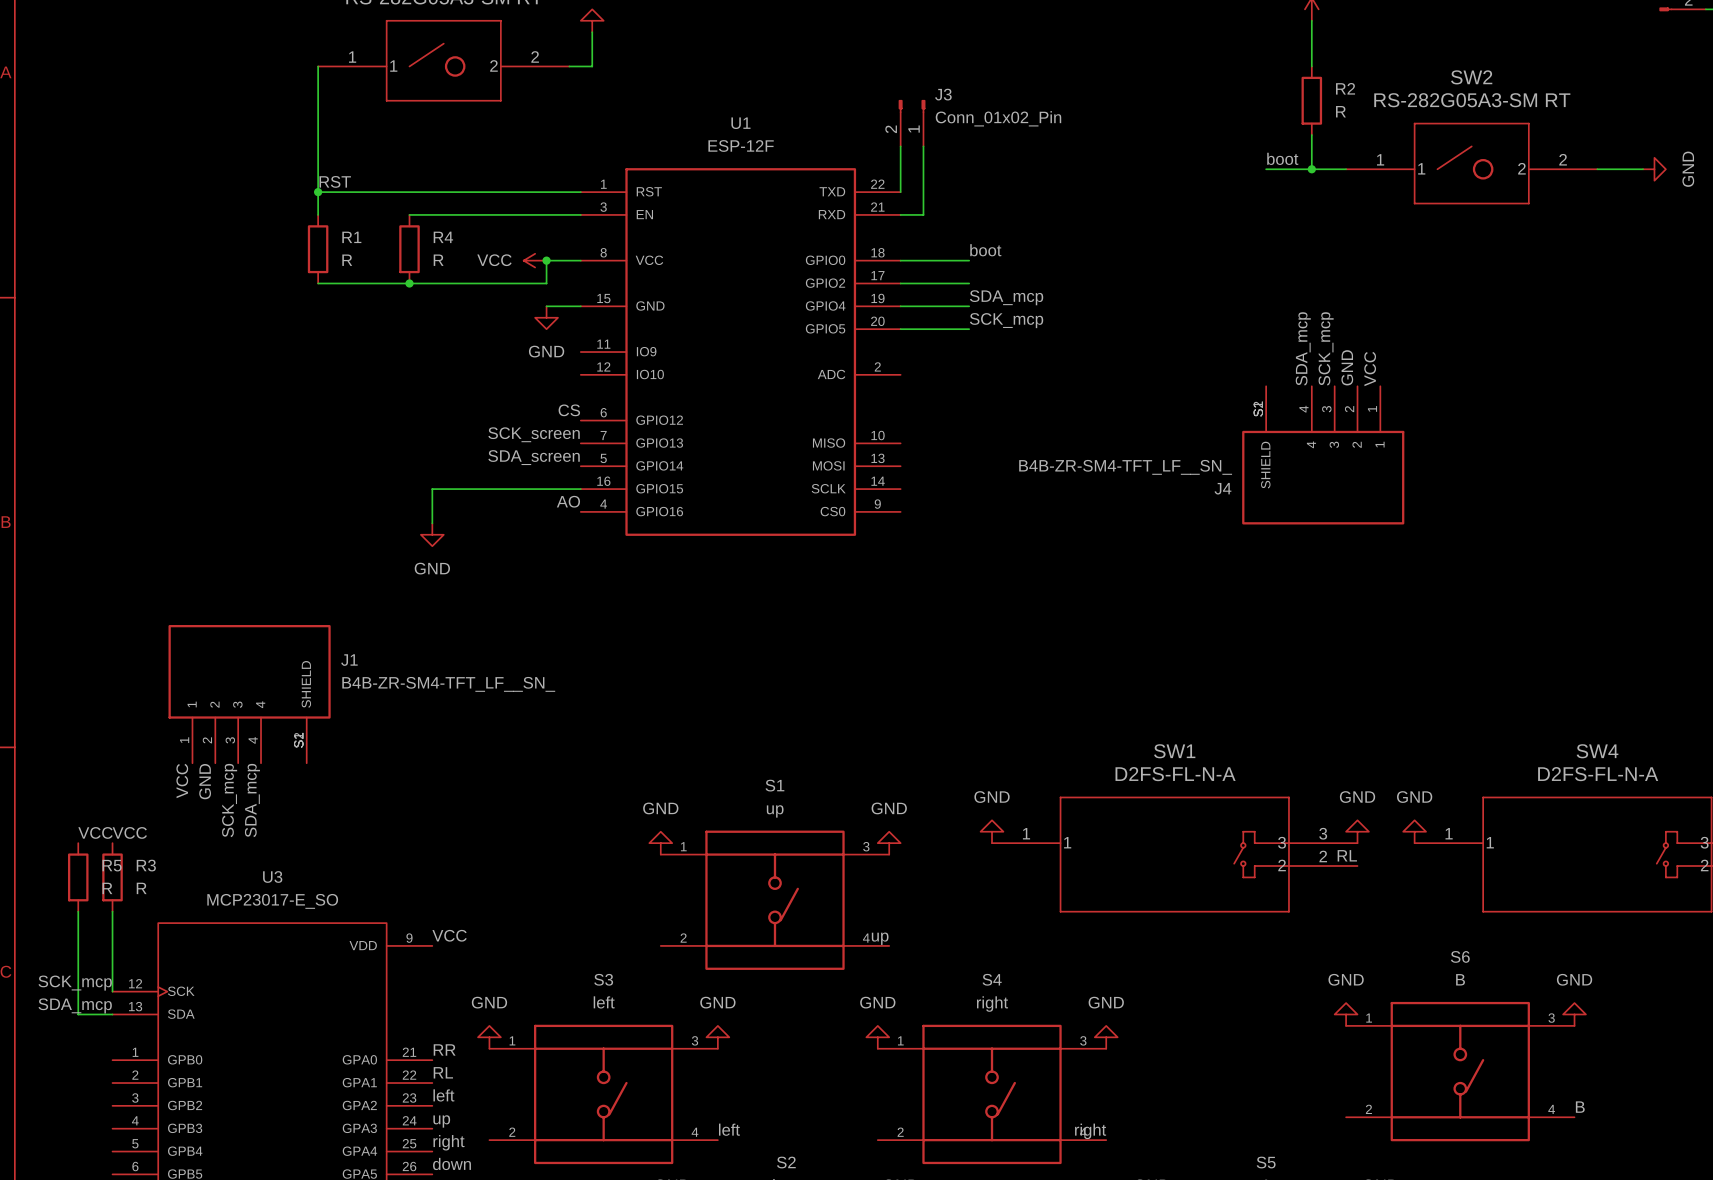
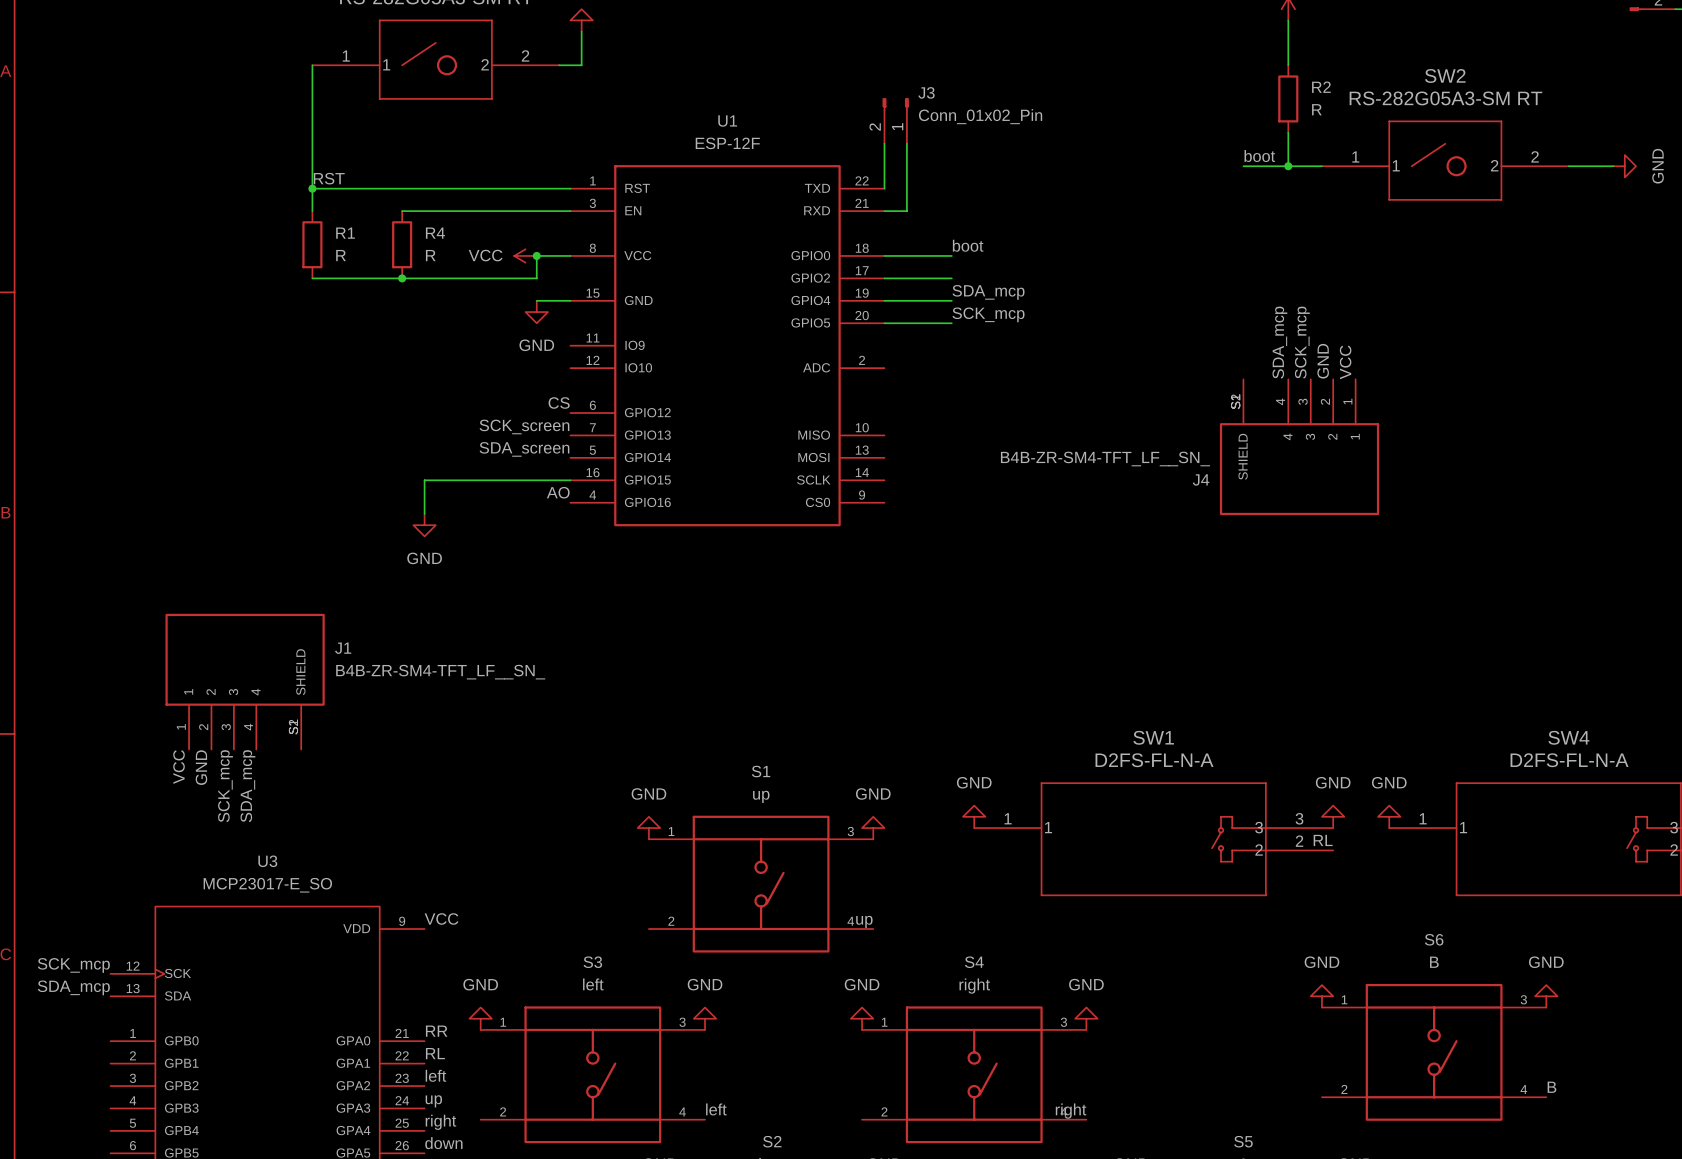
label: VCC (95, 832) -> none
label: VCC (129, 832) -> none
R5: R (78, 877) -> none
R3: R (112, 877) -> none
wire: (78, 911) (78, 1014) (112, 1014) -> none
wire: (112, 911) (112, 991) -> none

